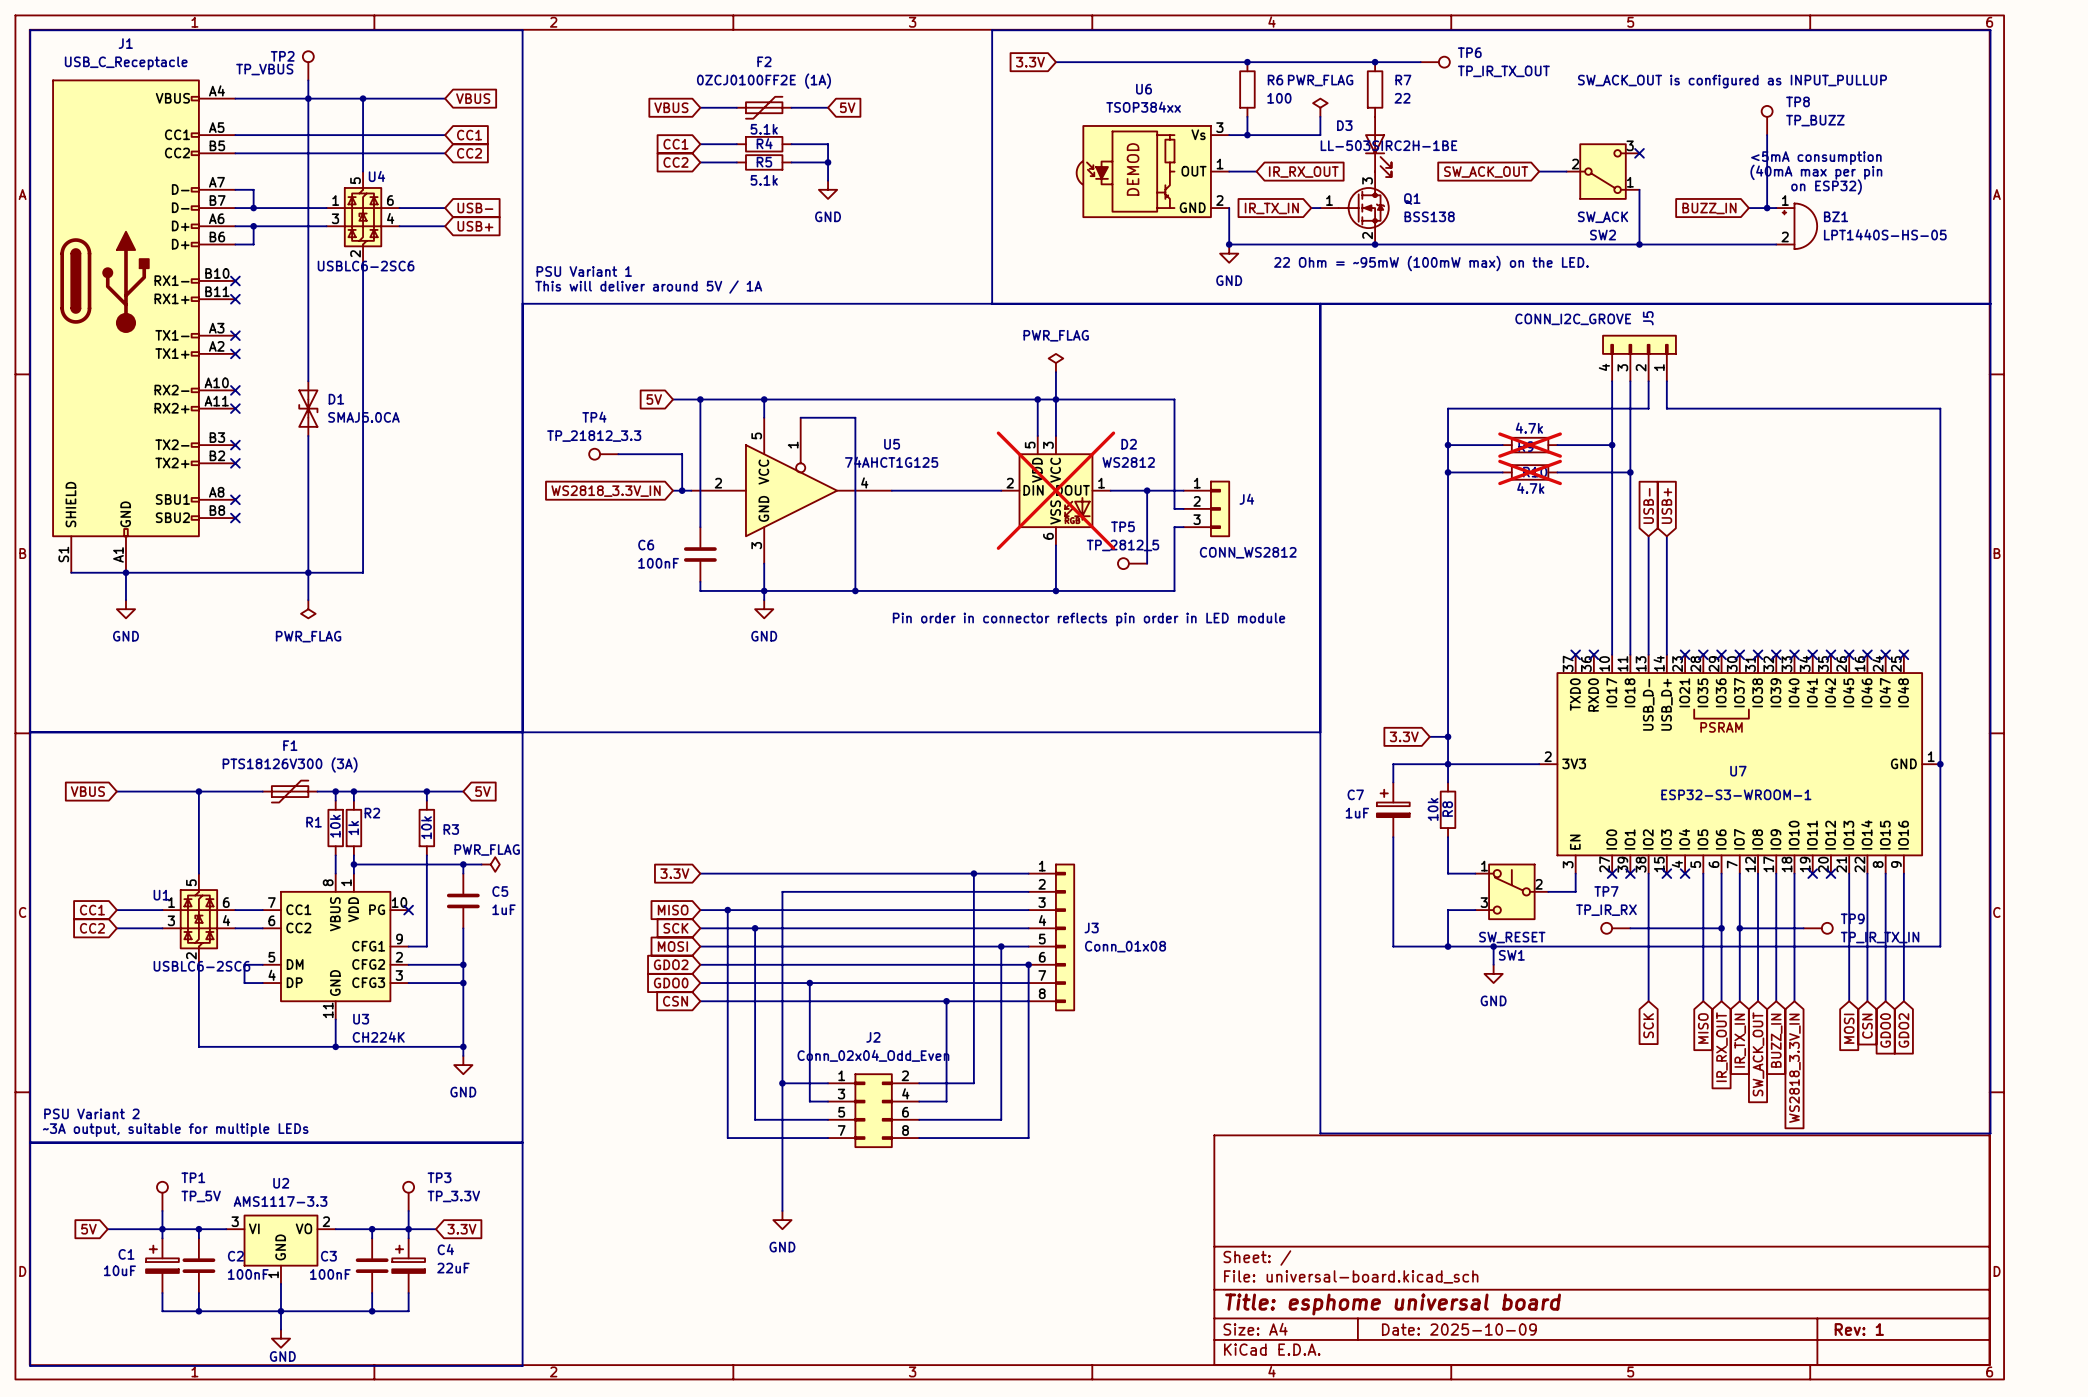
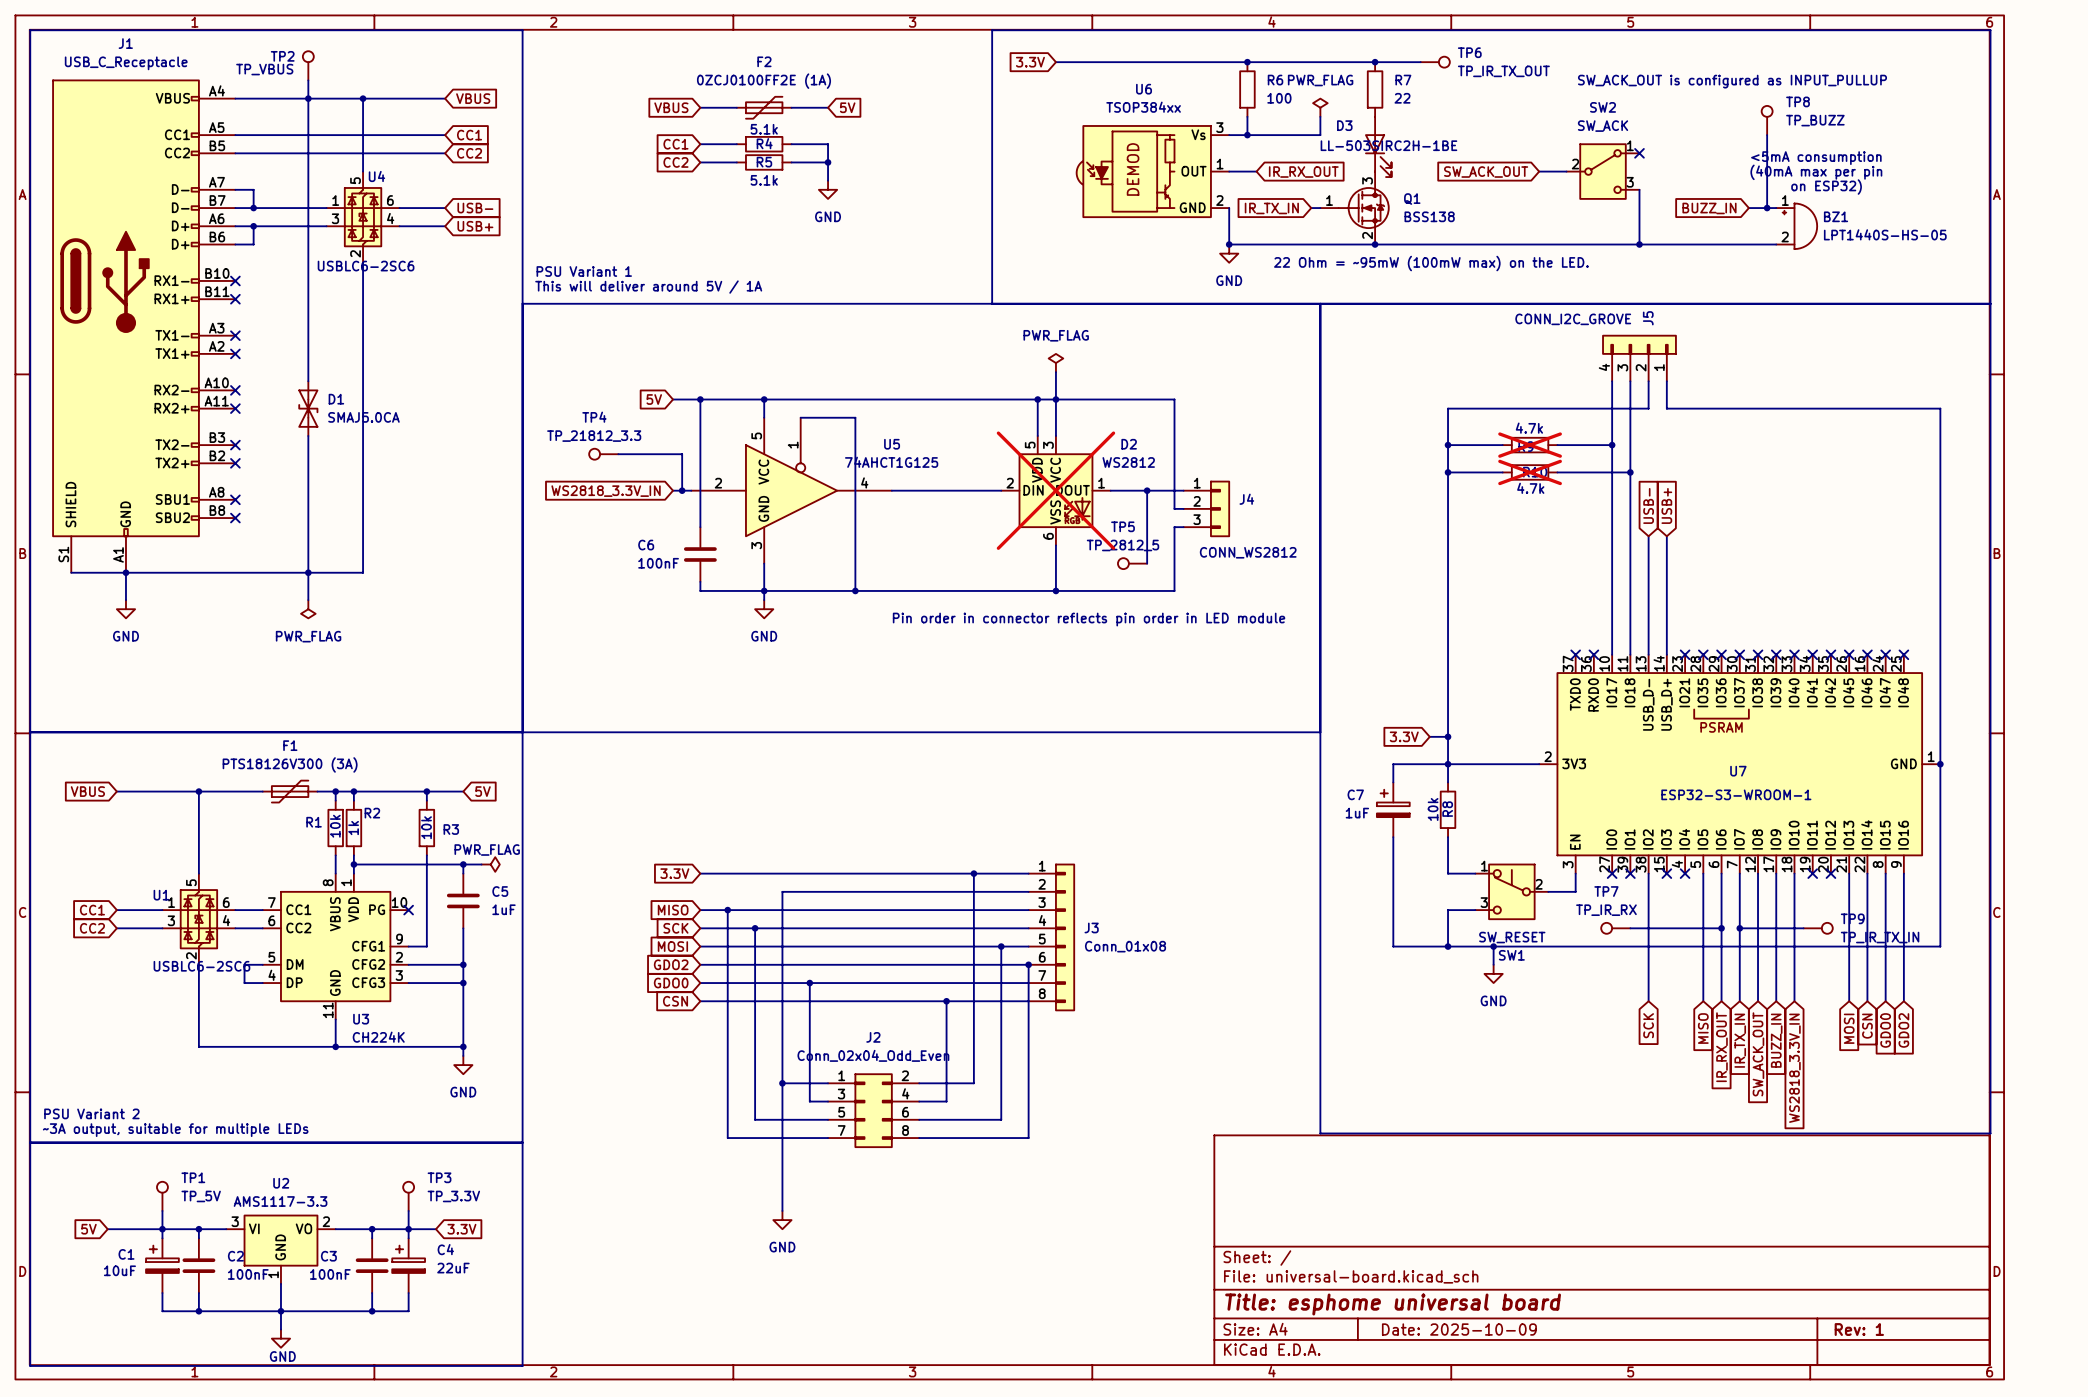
SW2 flip: as is (1603, 171) -> up-down (1603, 171)

